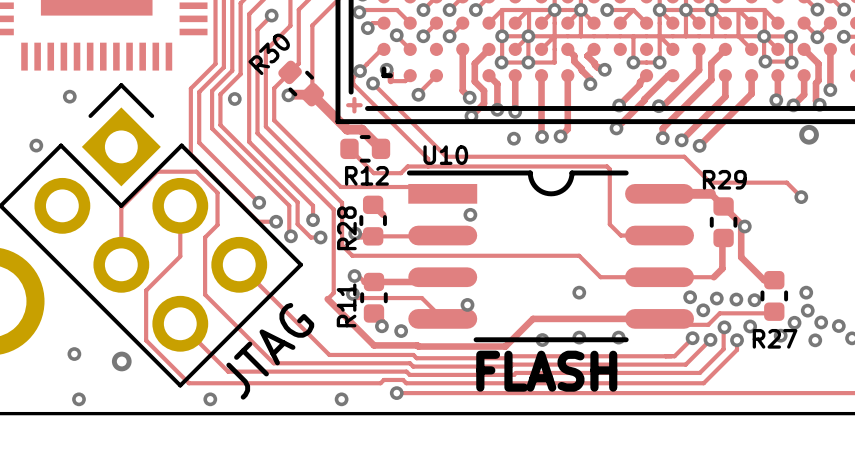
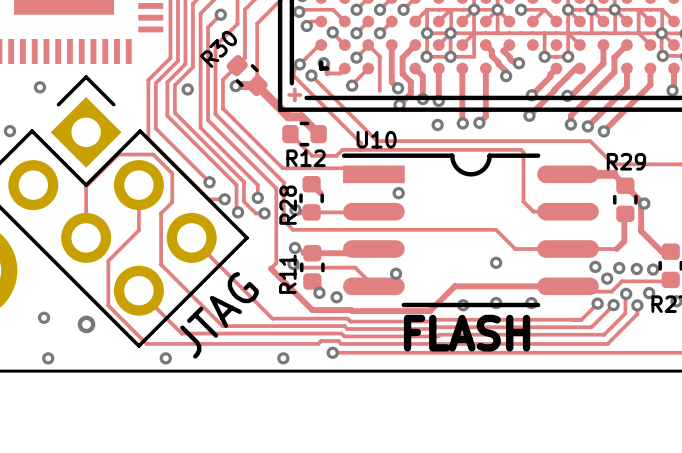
track: none -> (356, 57) (368, 45) (379, 56) (379, 90)
via: none -> (356, 57)

